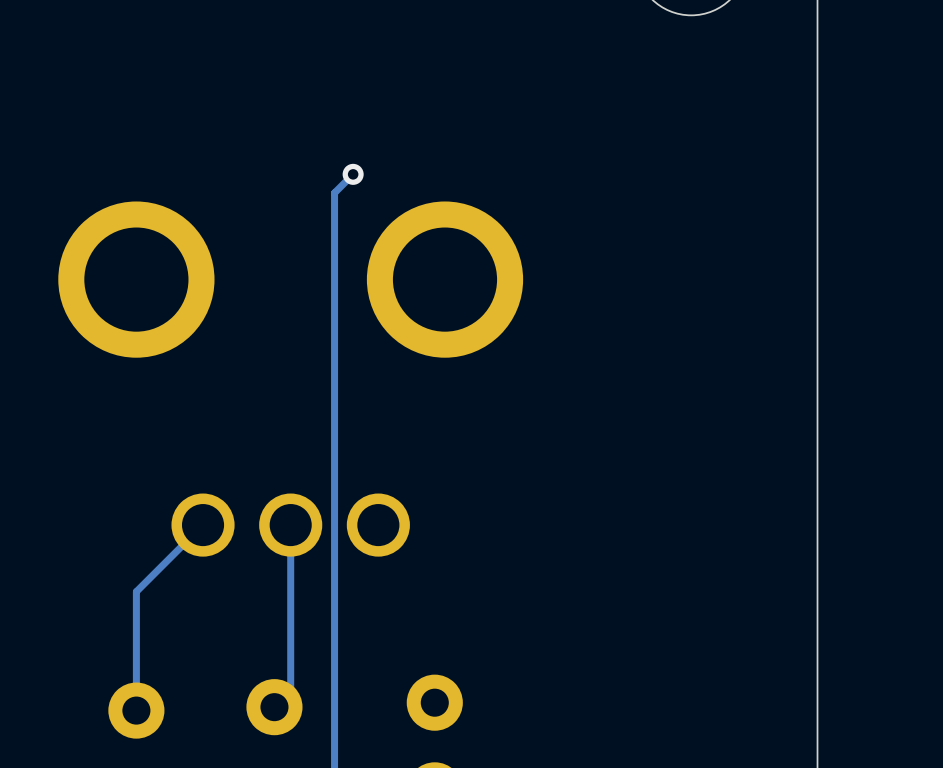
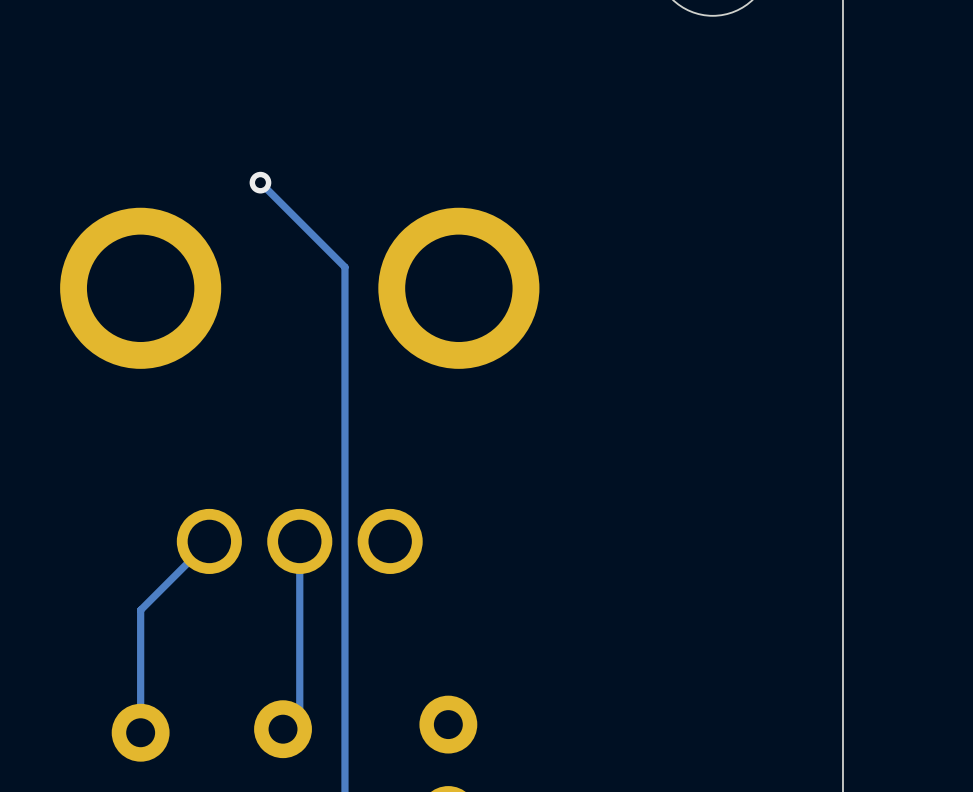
track: (353, 174) (334, 192) (334, 259) -> (260, 182) (344, 267)
via position: (353, 174) -> (260, 182)

